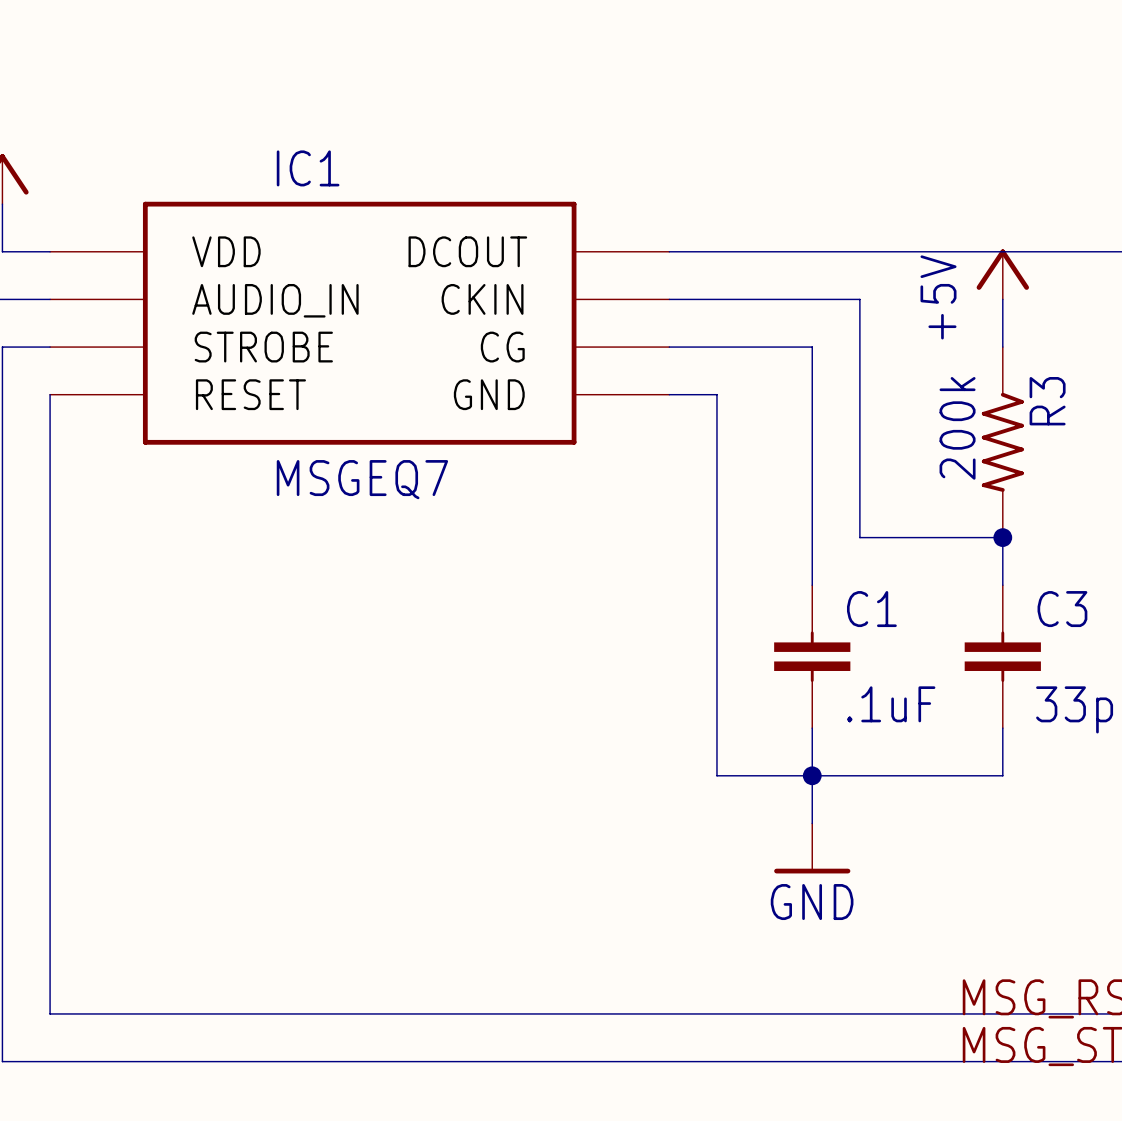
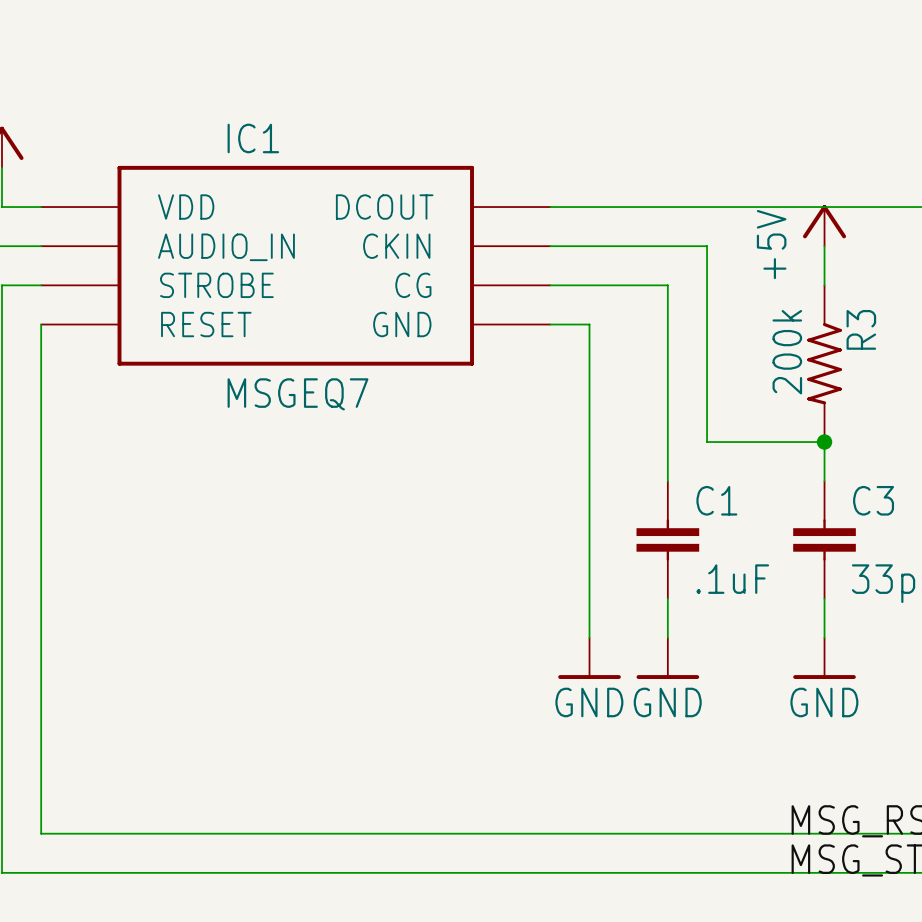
wire: (716, 775) (1002, 775) -> none
junction: (812, 775) -> none
power symbol: none -> GND (589, 658)
power symbol: none -> GND (824, 658)
power symbol position: GND (812, 848) -> GND (667, 658)

